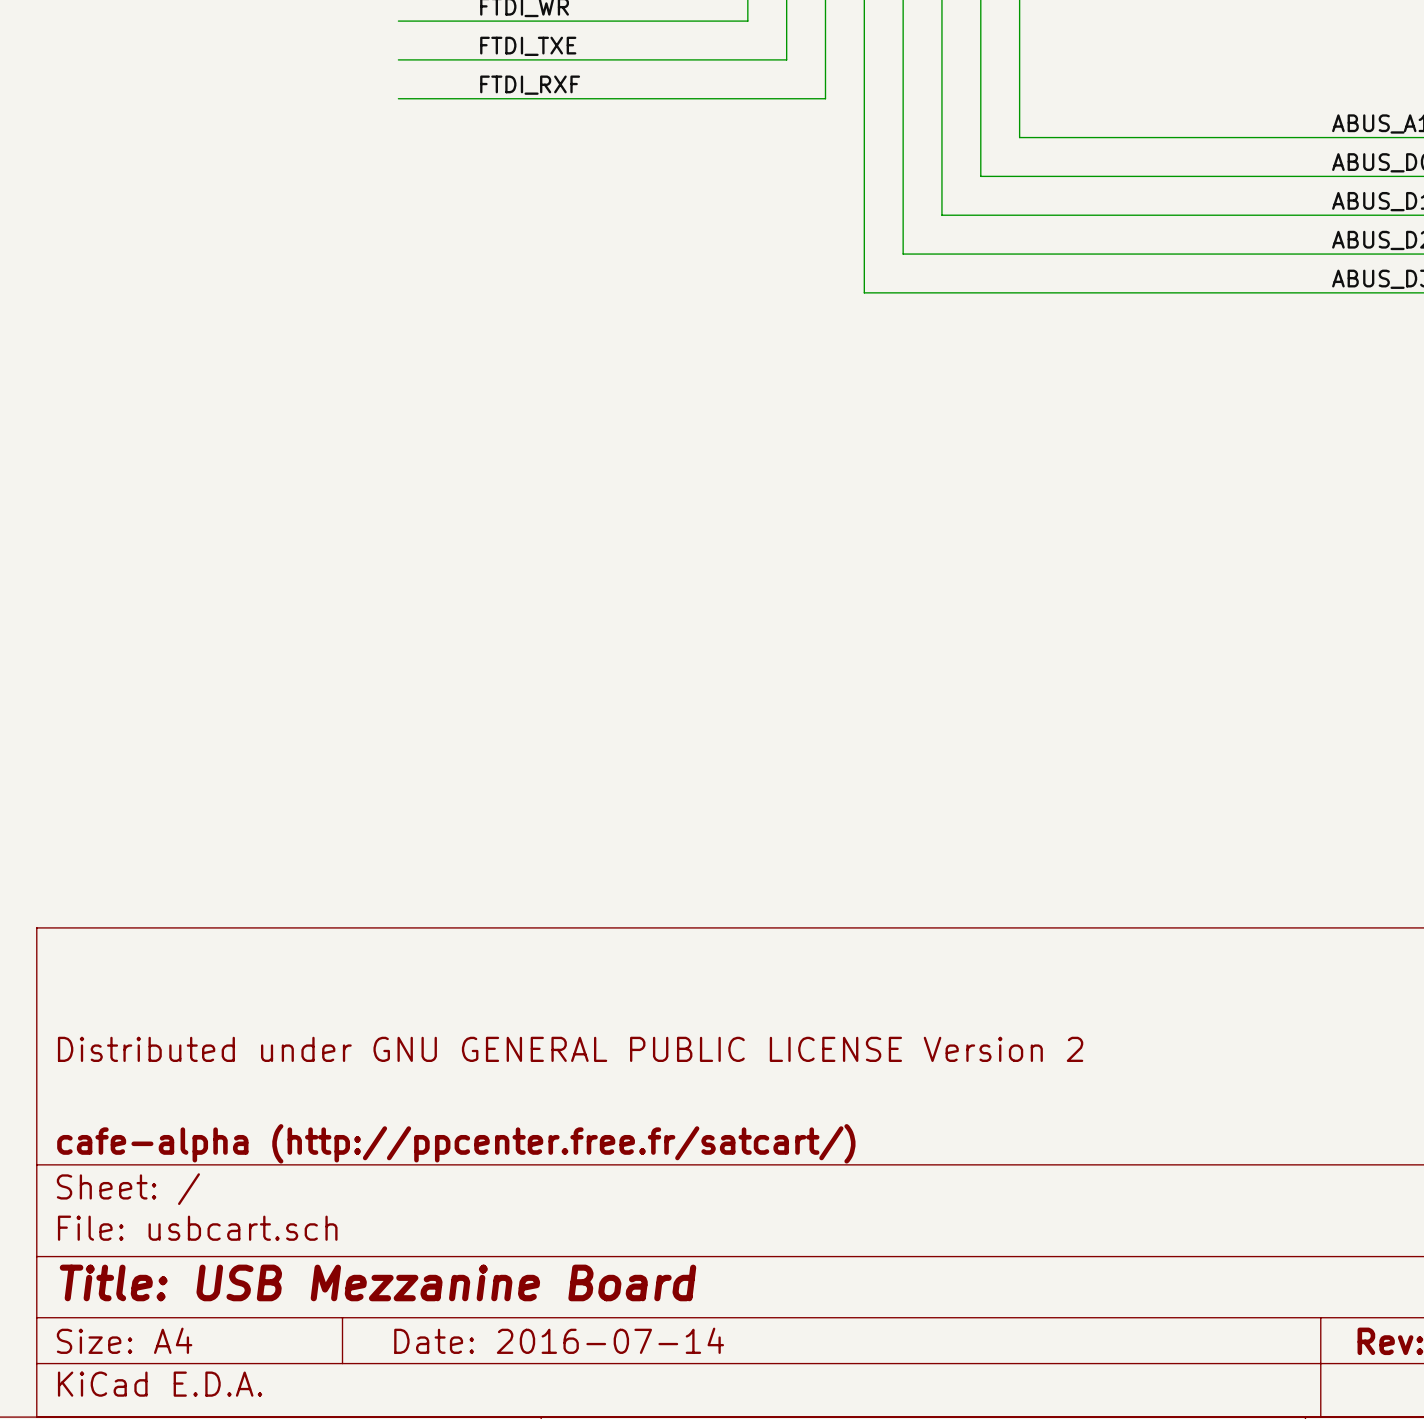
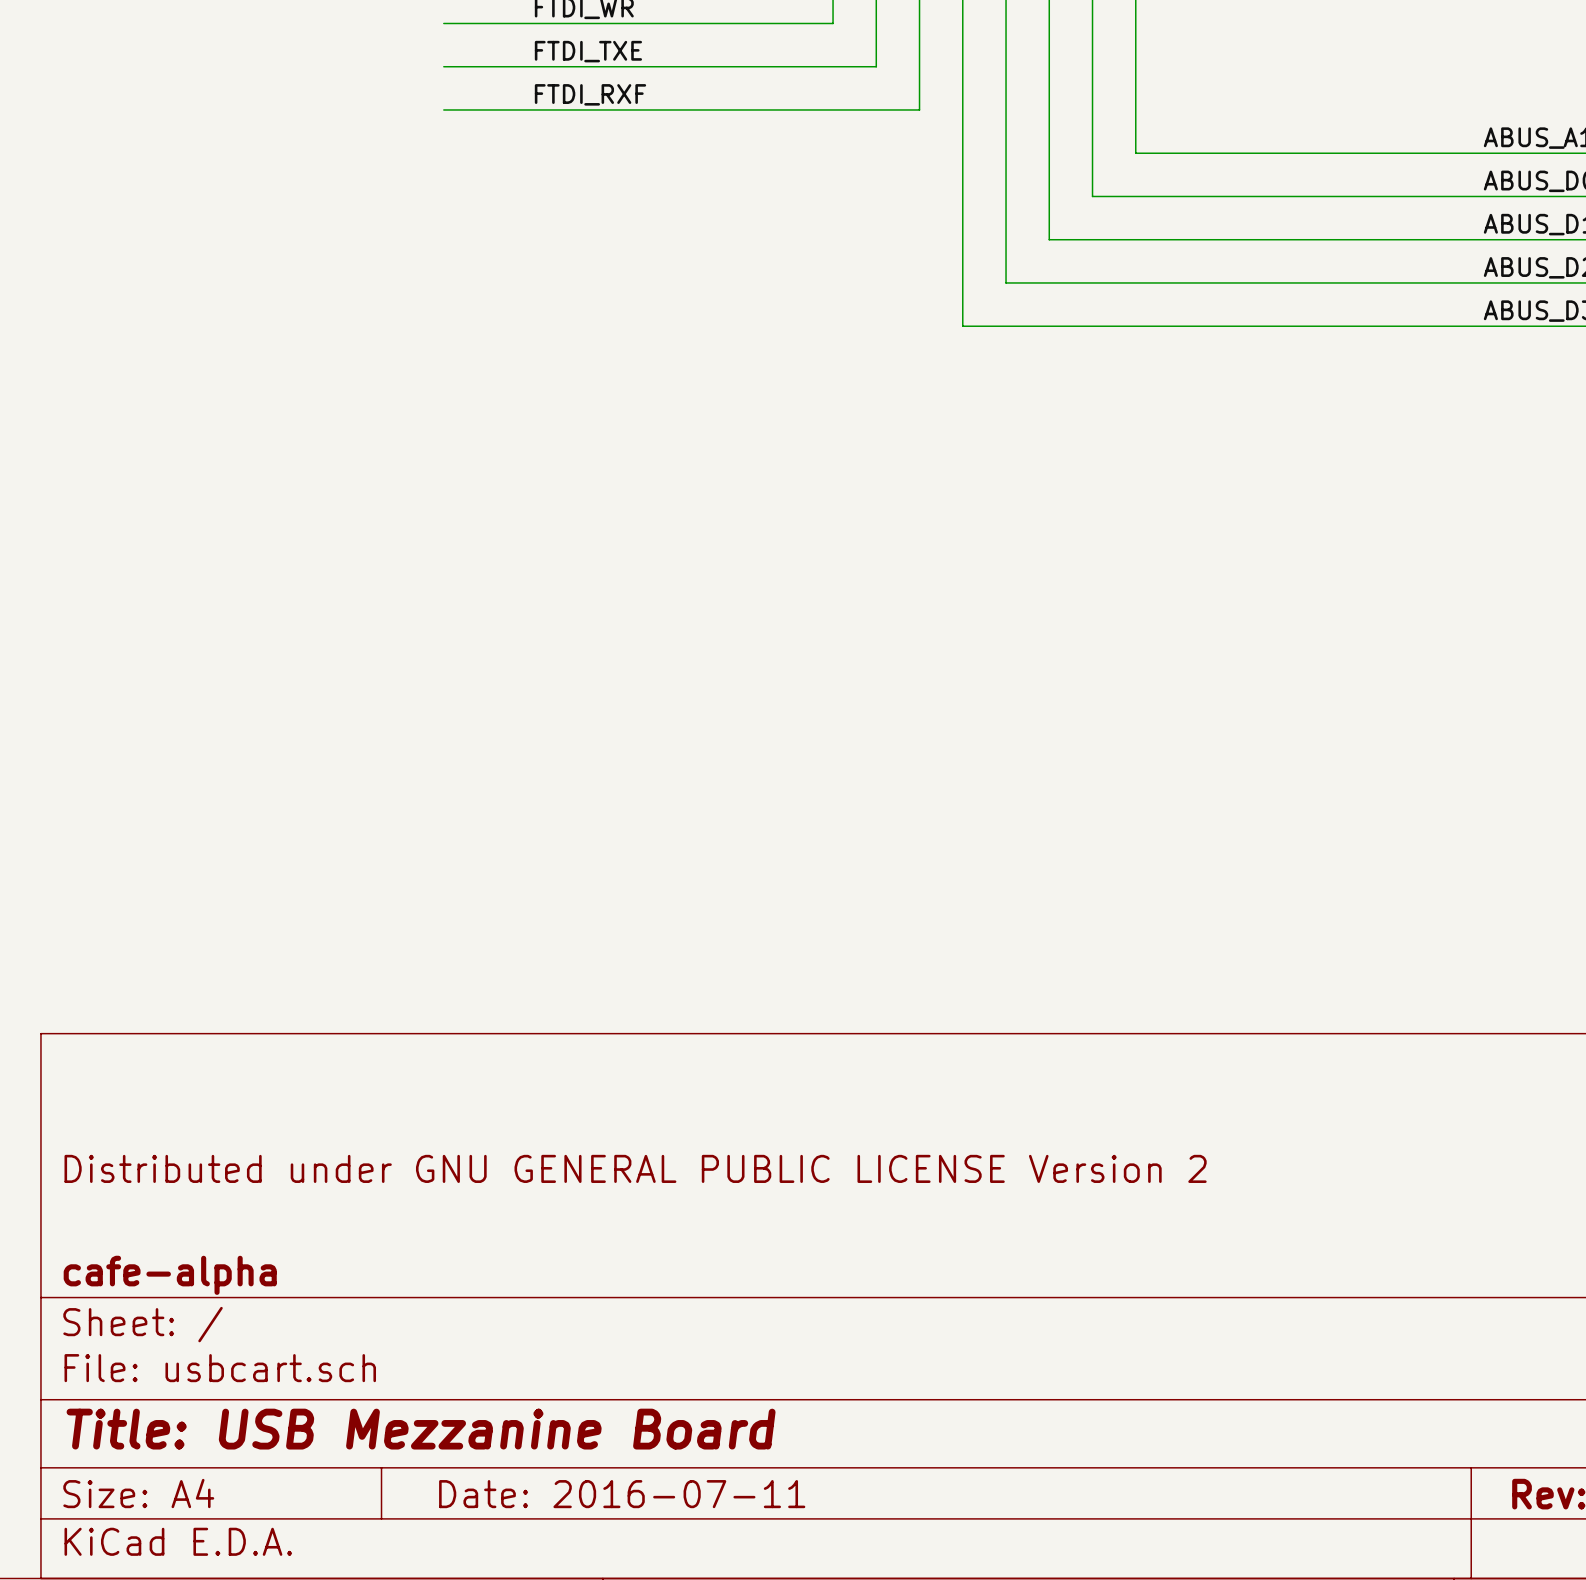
title block: cafe-alpha (http://ppcenter.free.fr/satcart/) (456, 1143) -> cafe-alpha (170, 1275)
title block: Date: 2016-07-14 (559, 1340) -> Date: 2016-07-11 (622, 1494)

